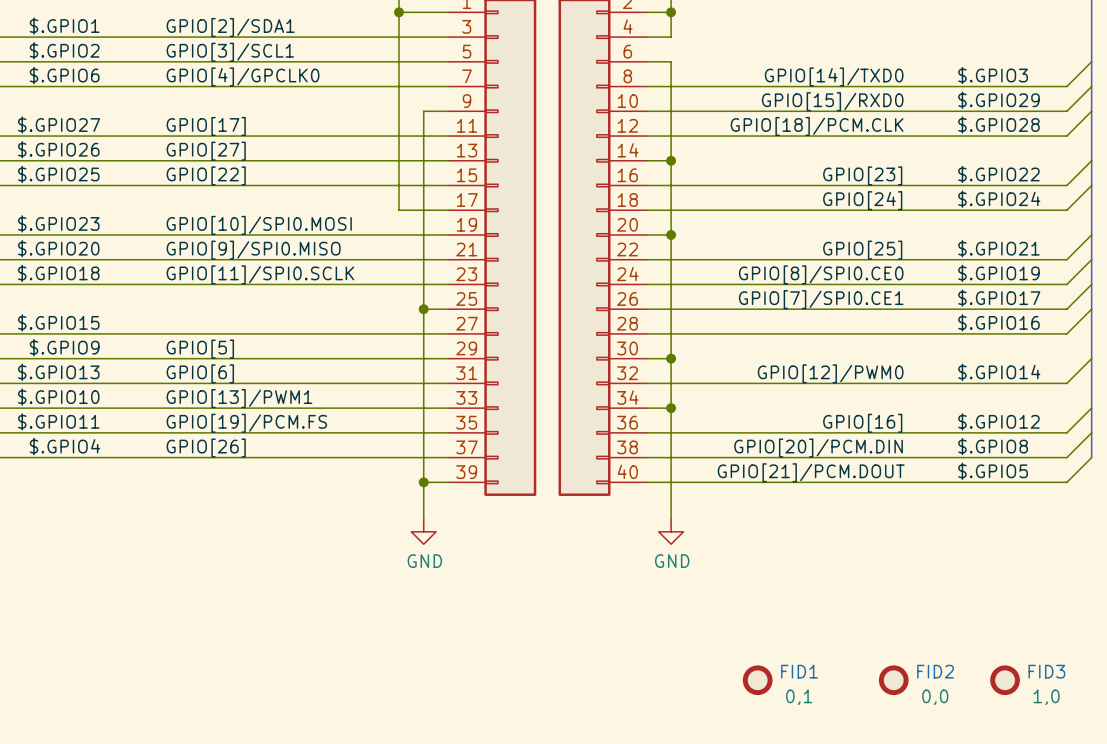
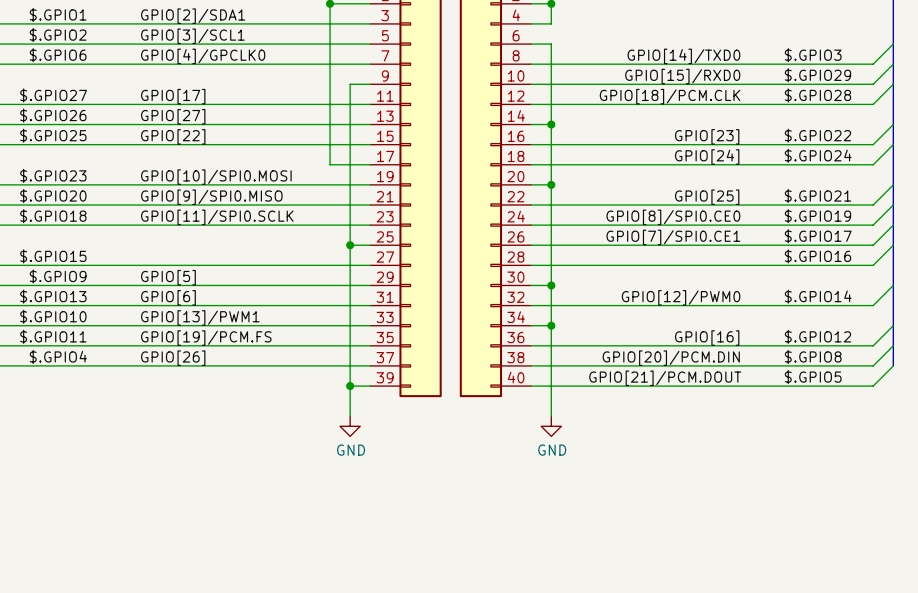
FID1: 0,1 (757, 680) -> none
FID2: 0,0 (893, 680) -> none
FID3: 1,0 (1005, 680) -> none

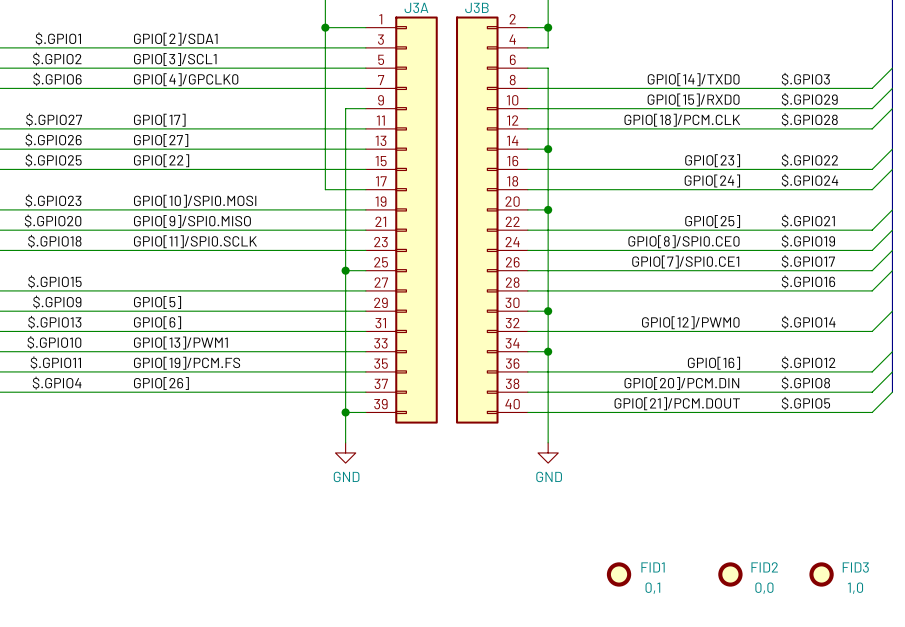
FID1: none -> 0,1 (619, 574)
FID2: none -> 0,0 (730, 574)
FID3: none -> 1,0 (821, 574)

